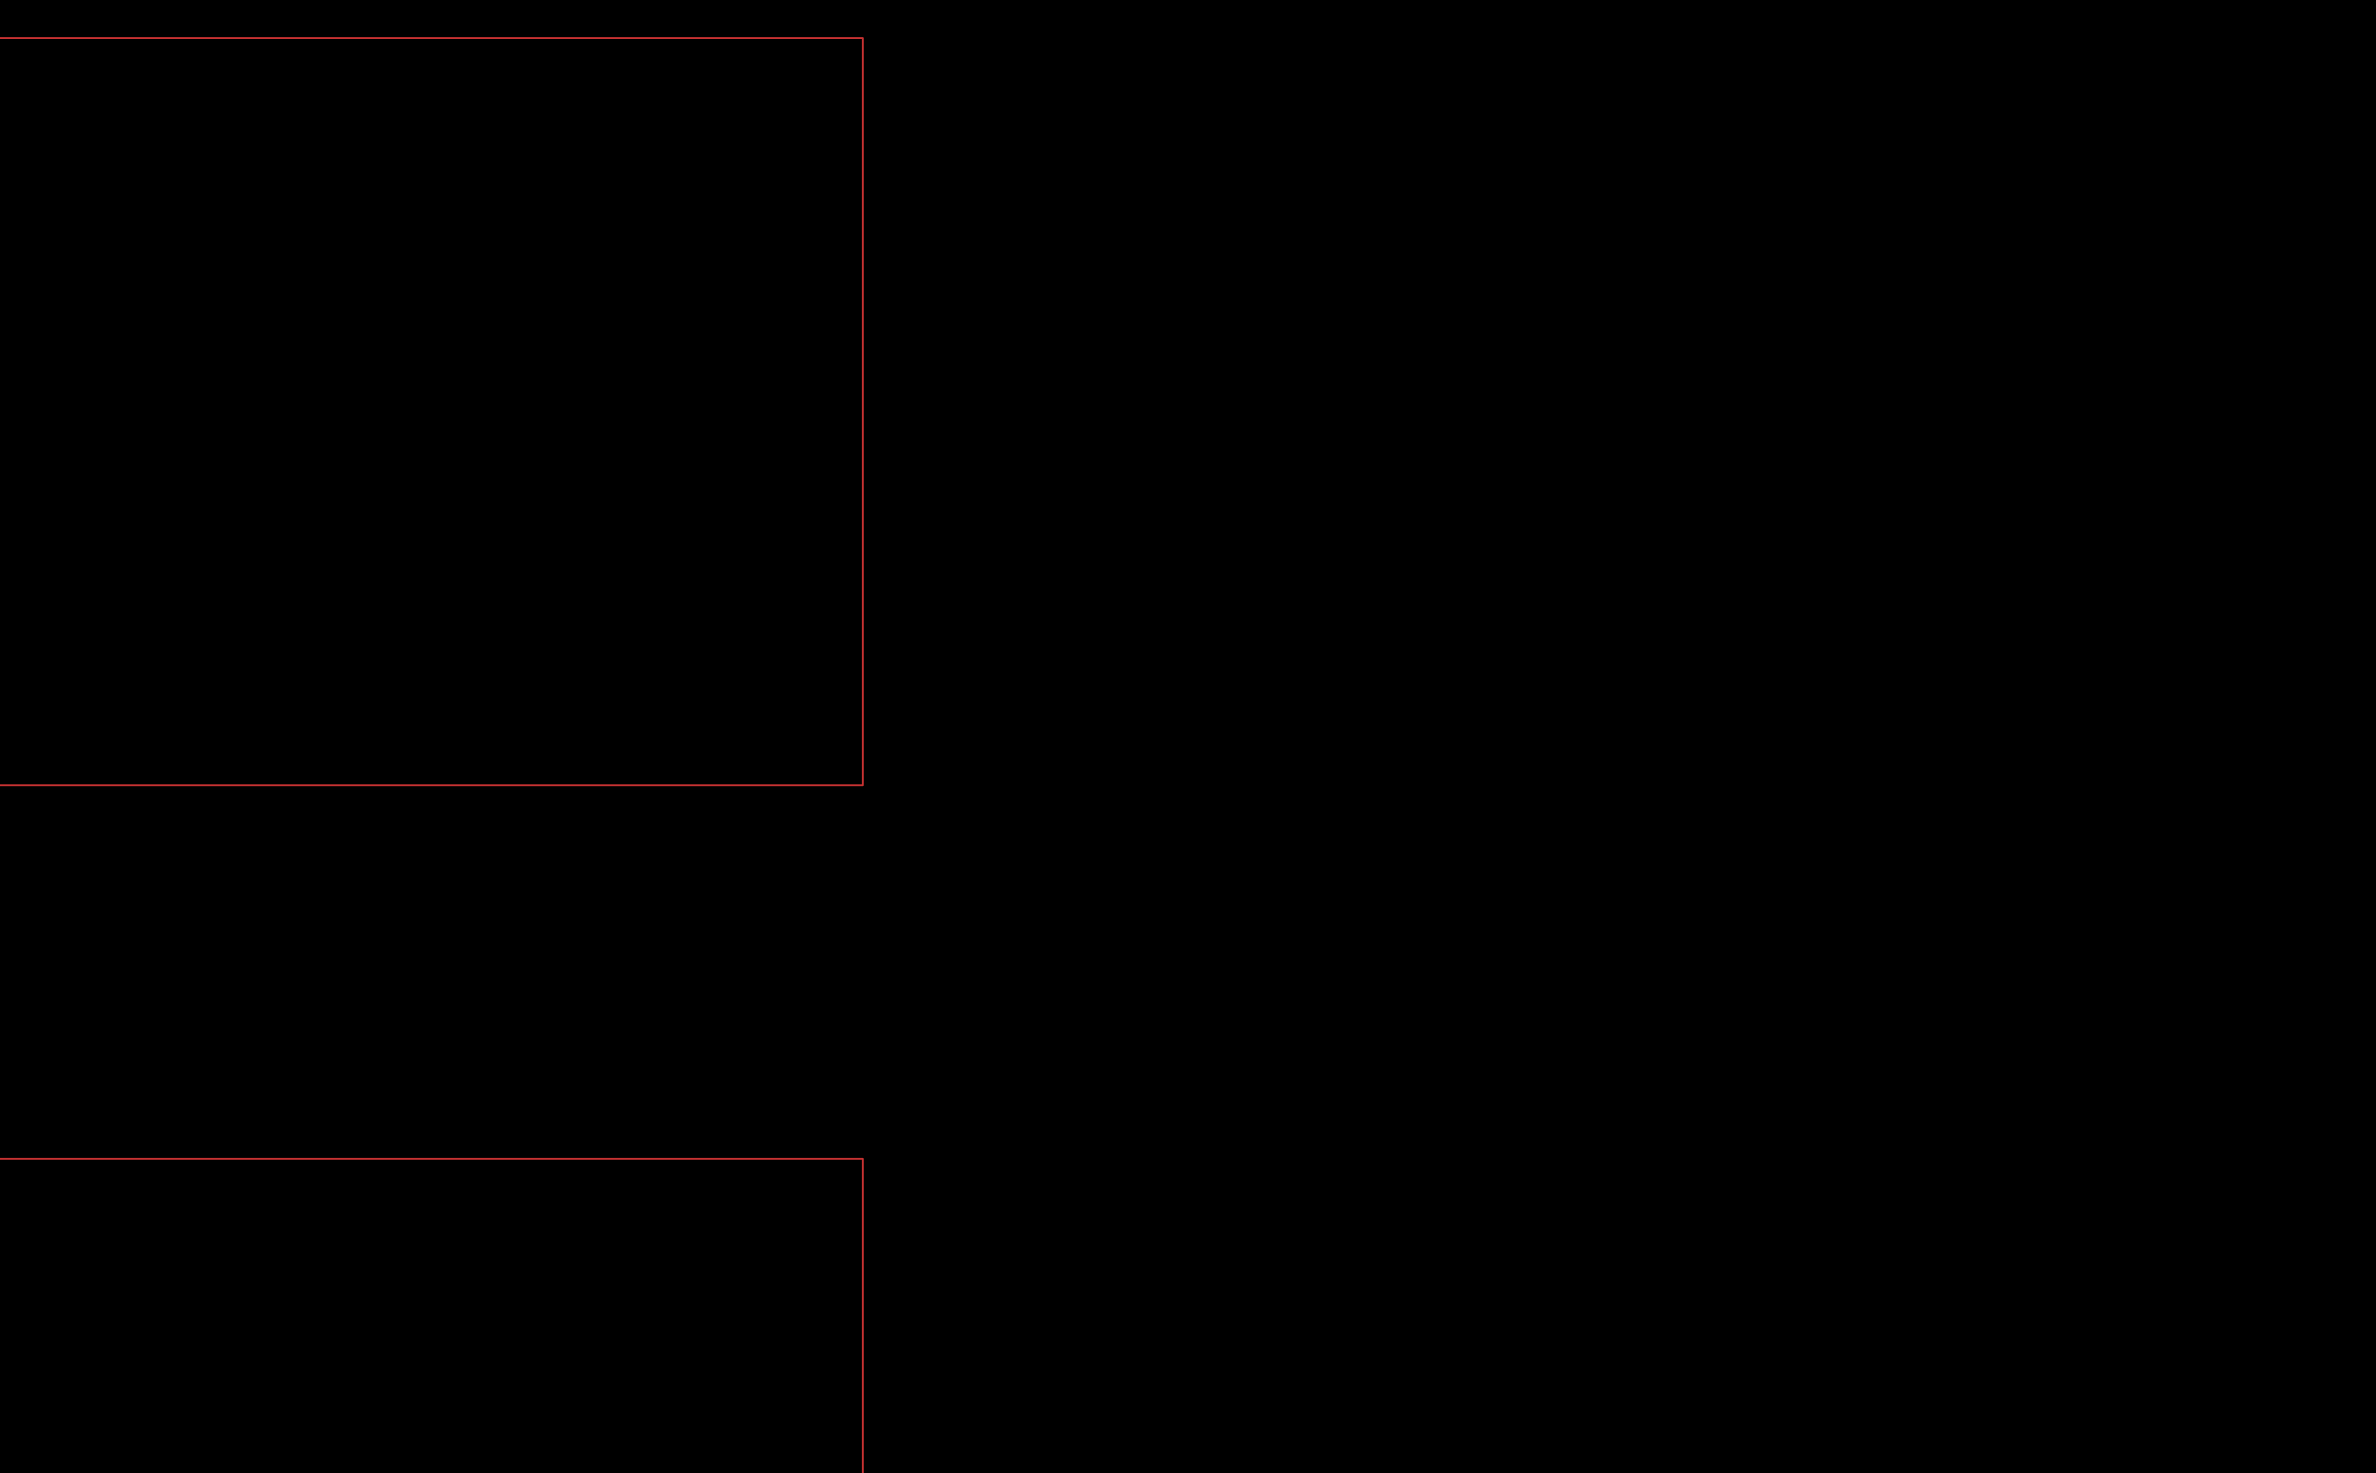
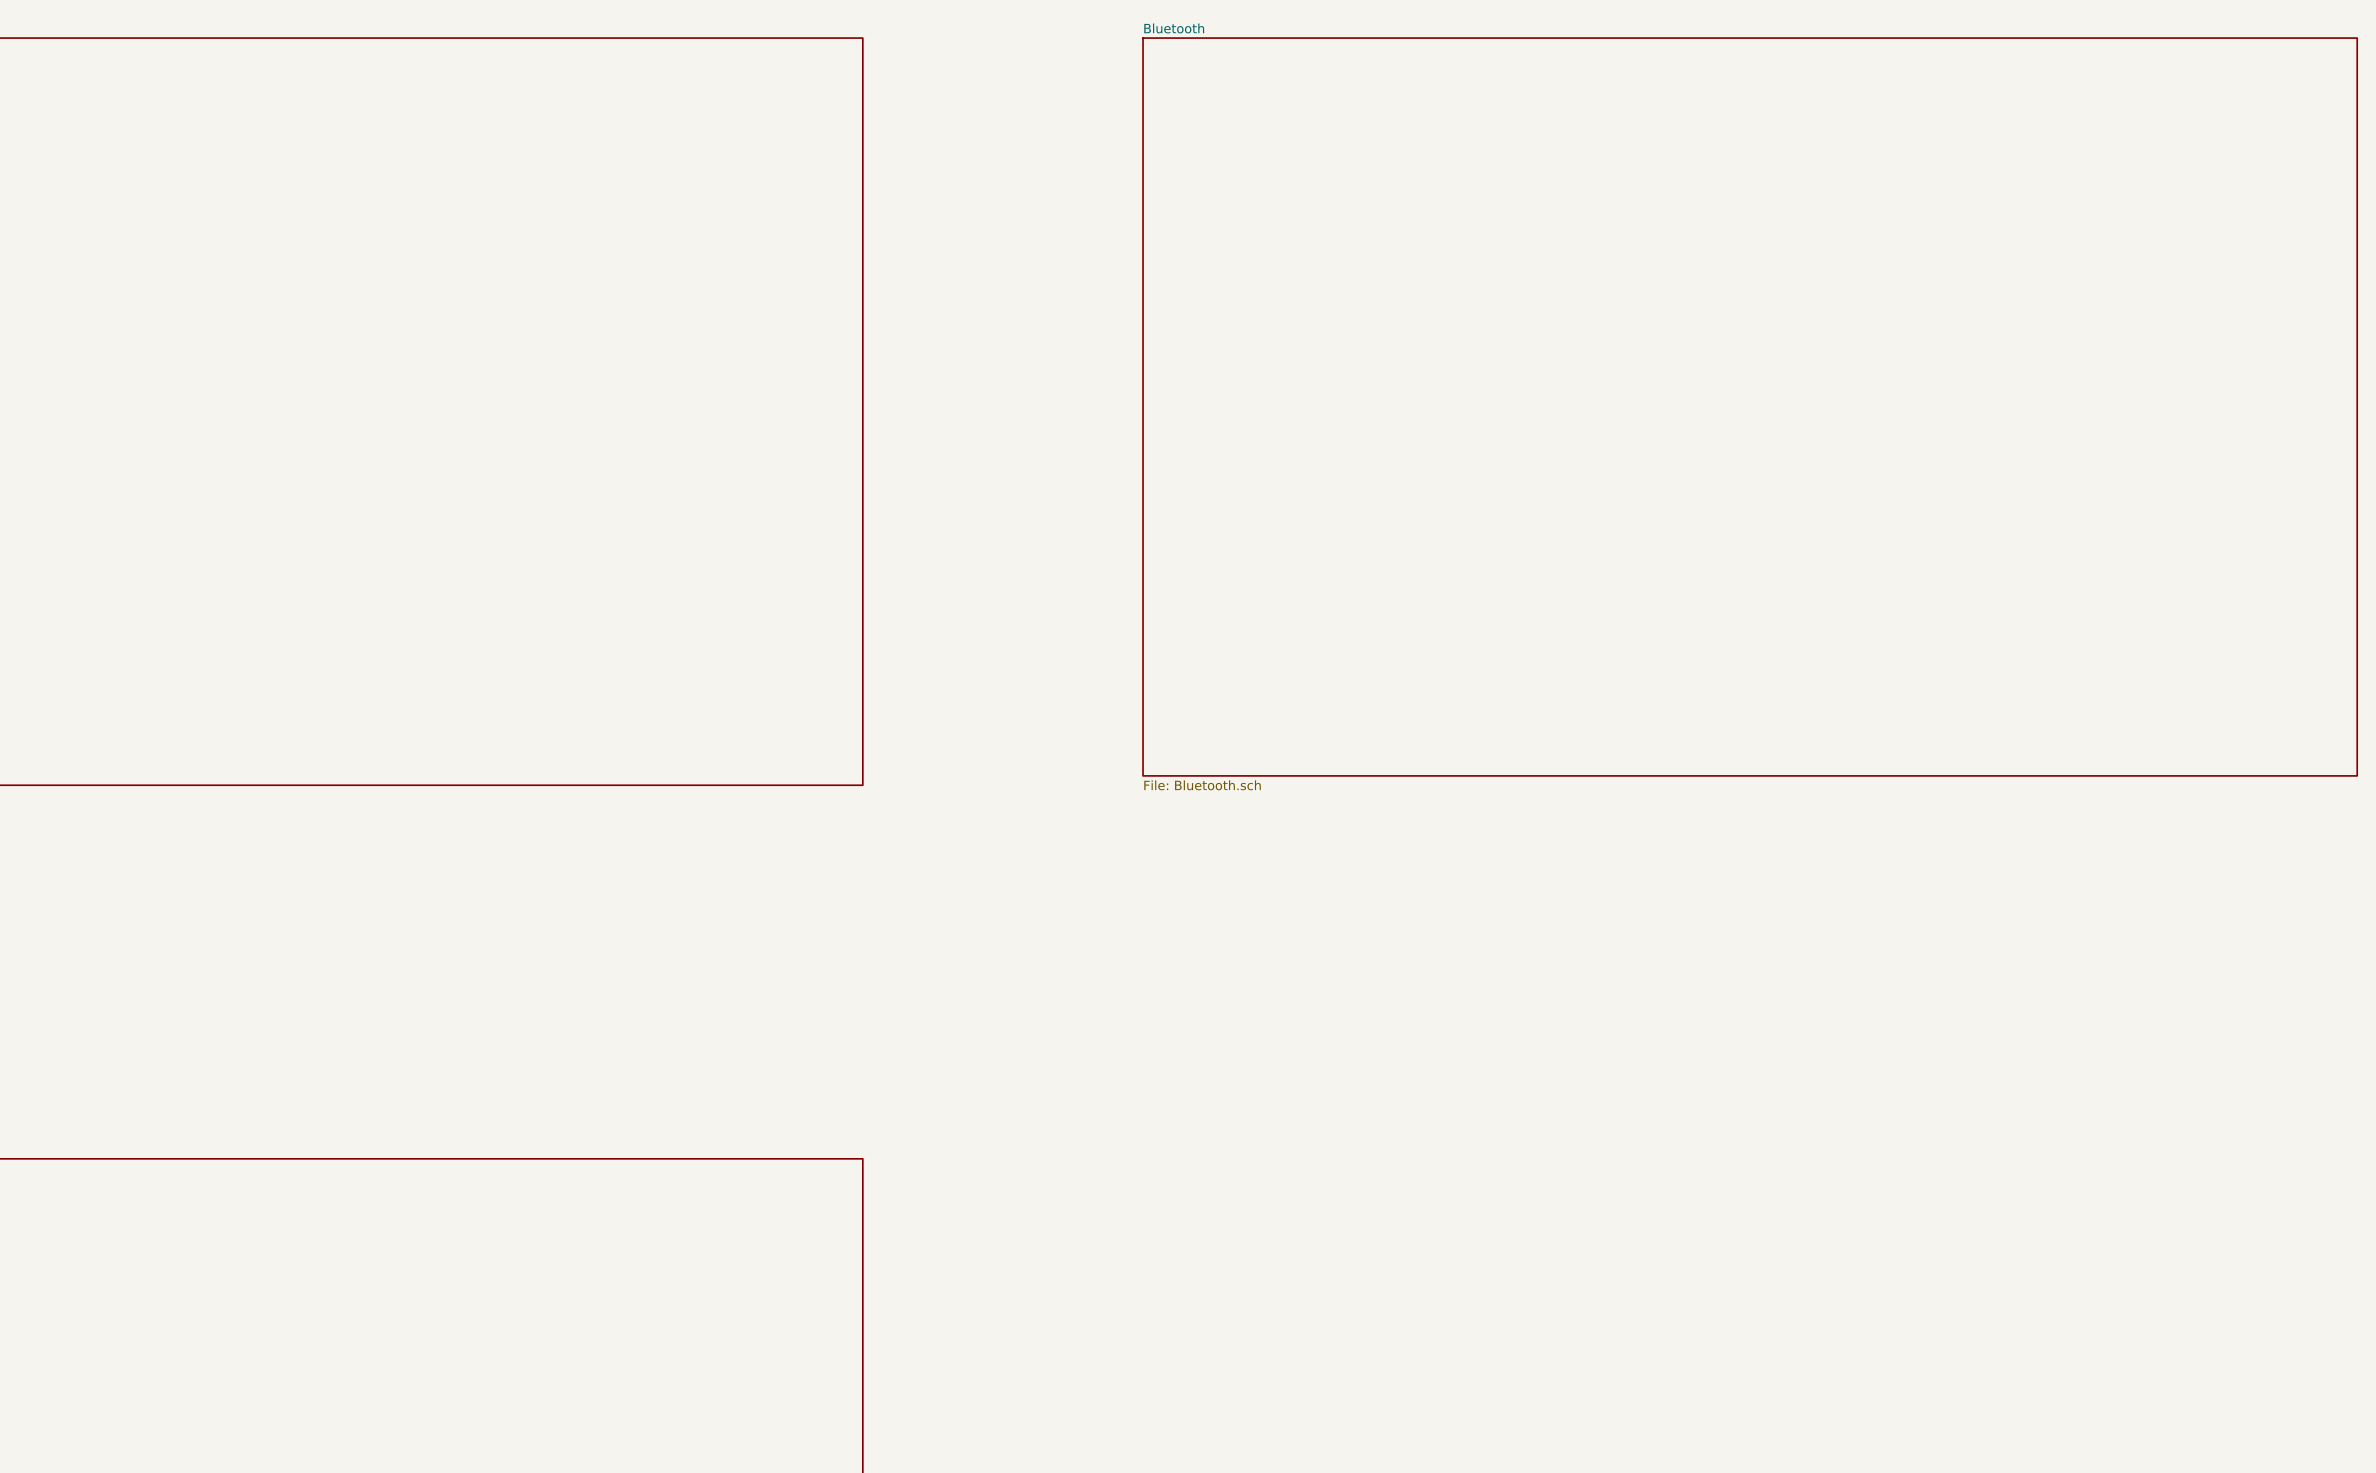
sheet Bluetooth: none -> File: Bluetooth.sch (1750, 406)

